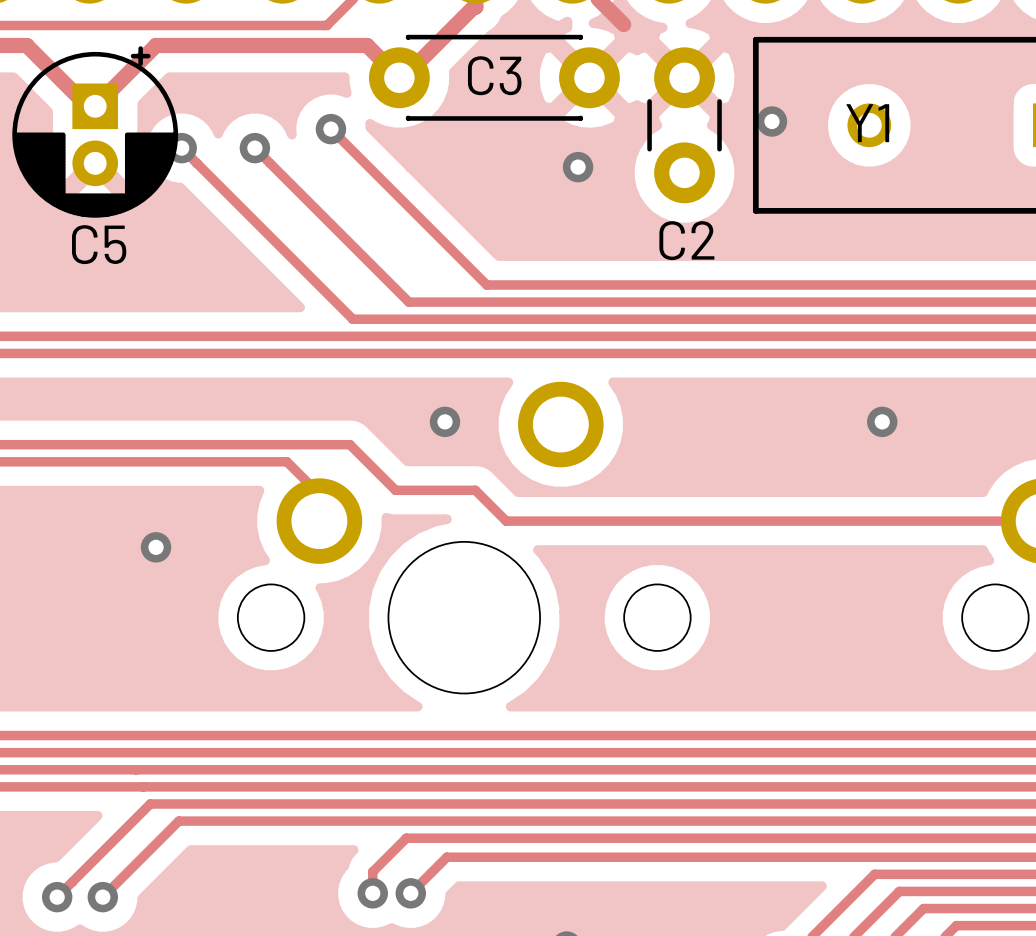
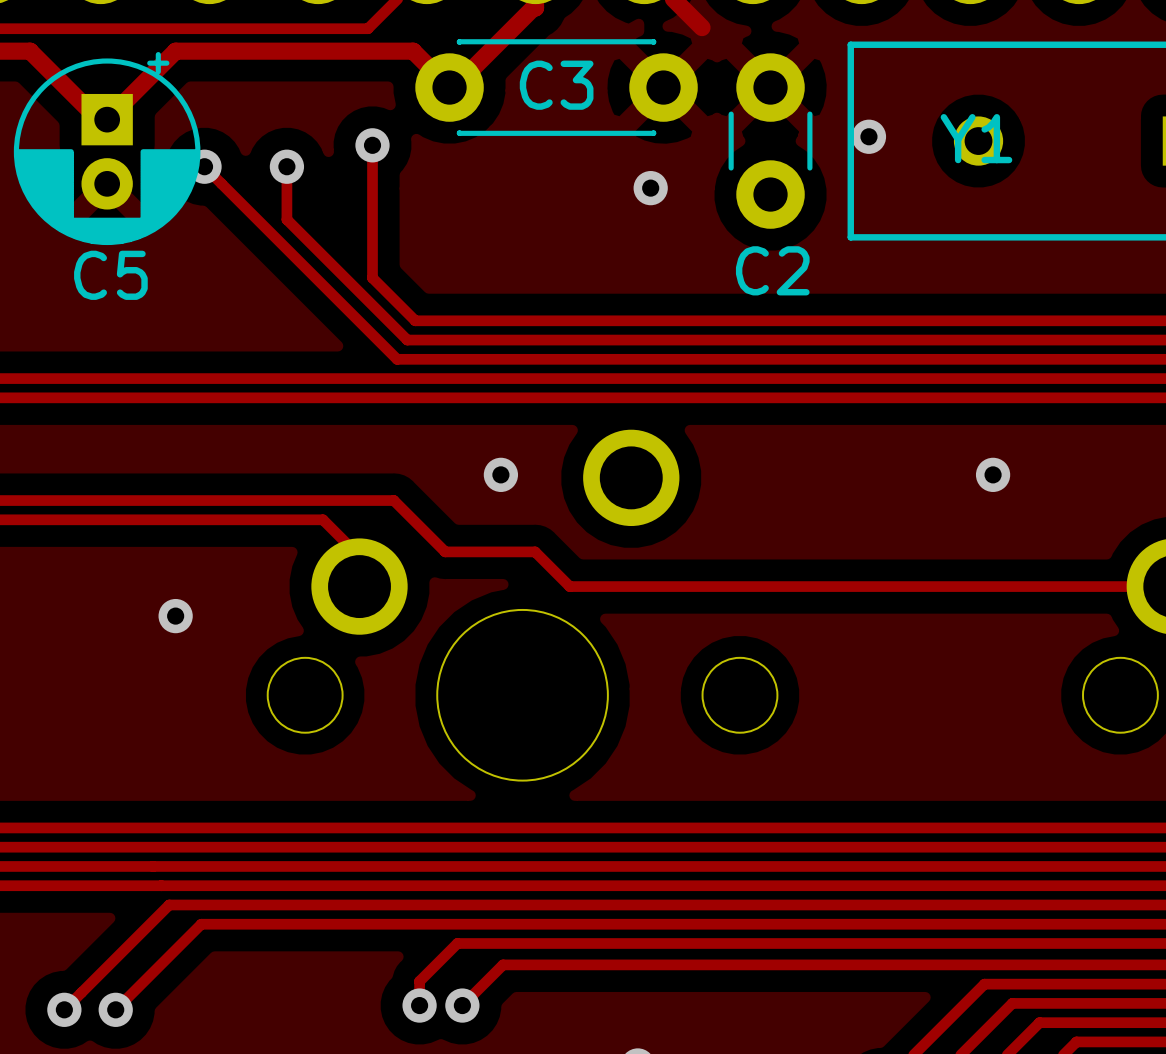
track: (330, 129) (486, 284) -> (372, 145) (372, 278) (415, 320) (547, 320)
track: (254, 148) (408, 302) -> (286, 166) (286, 219) (407, 340) (460, 340)

